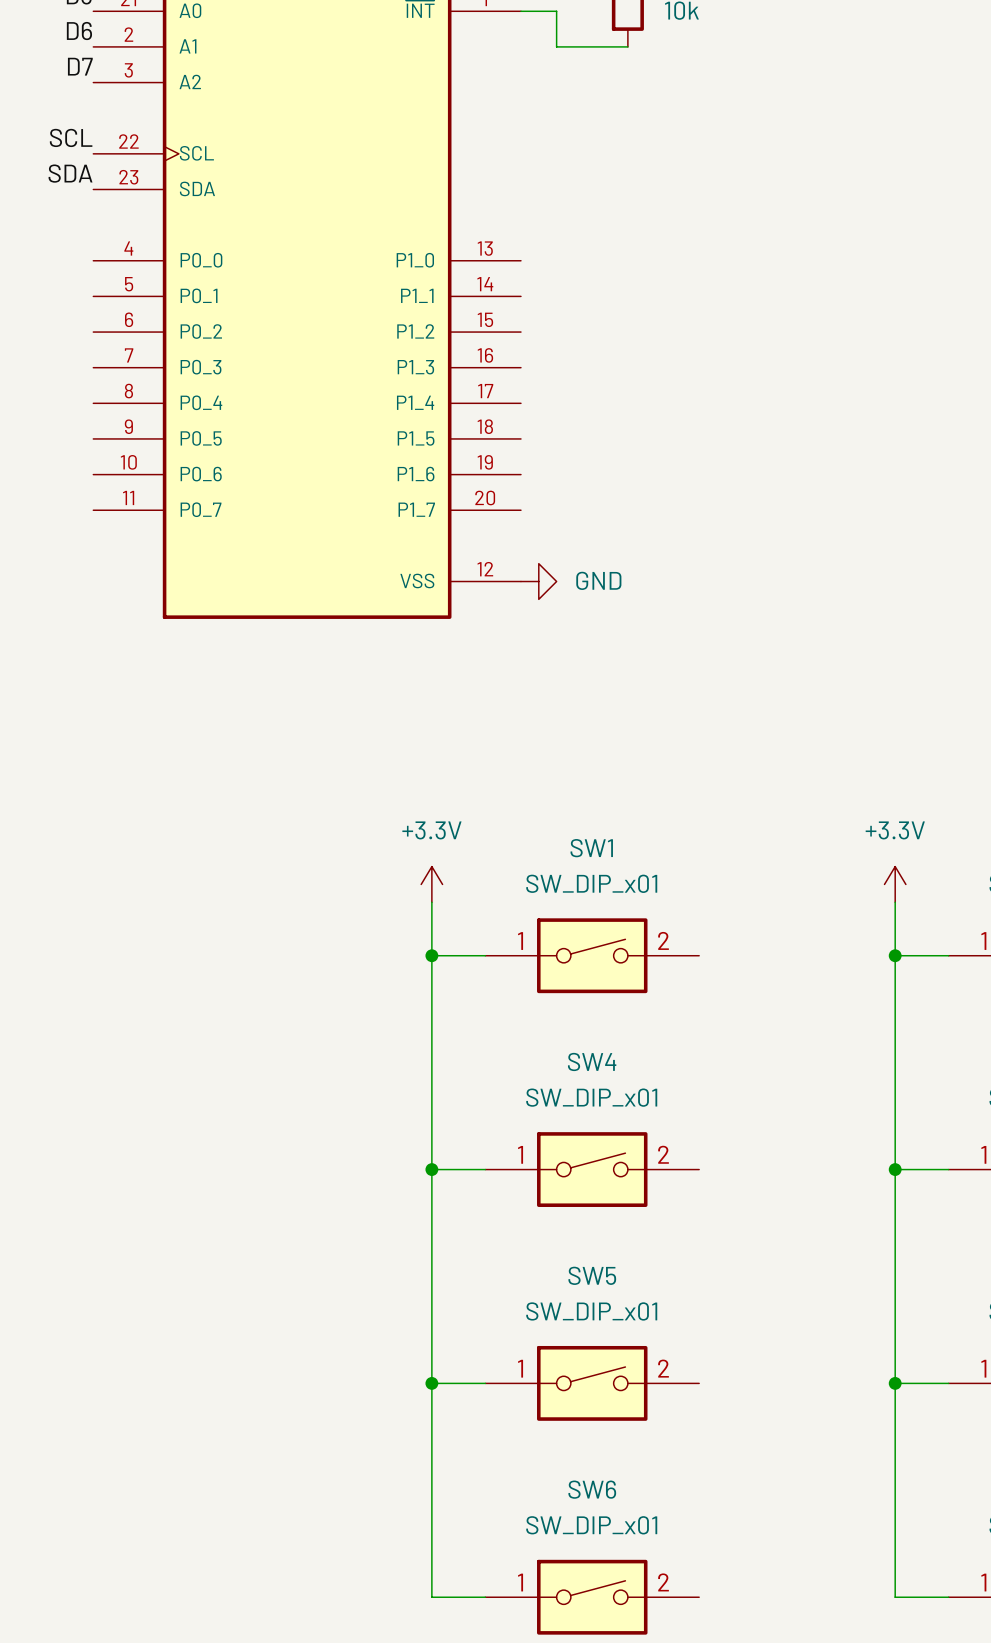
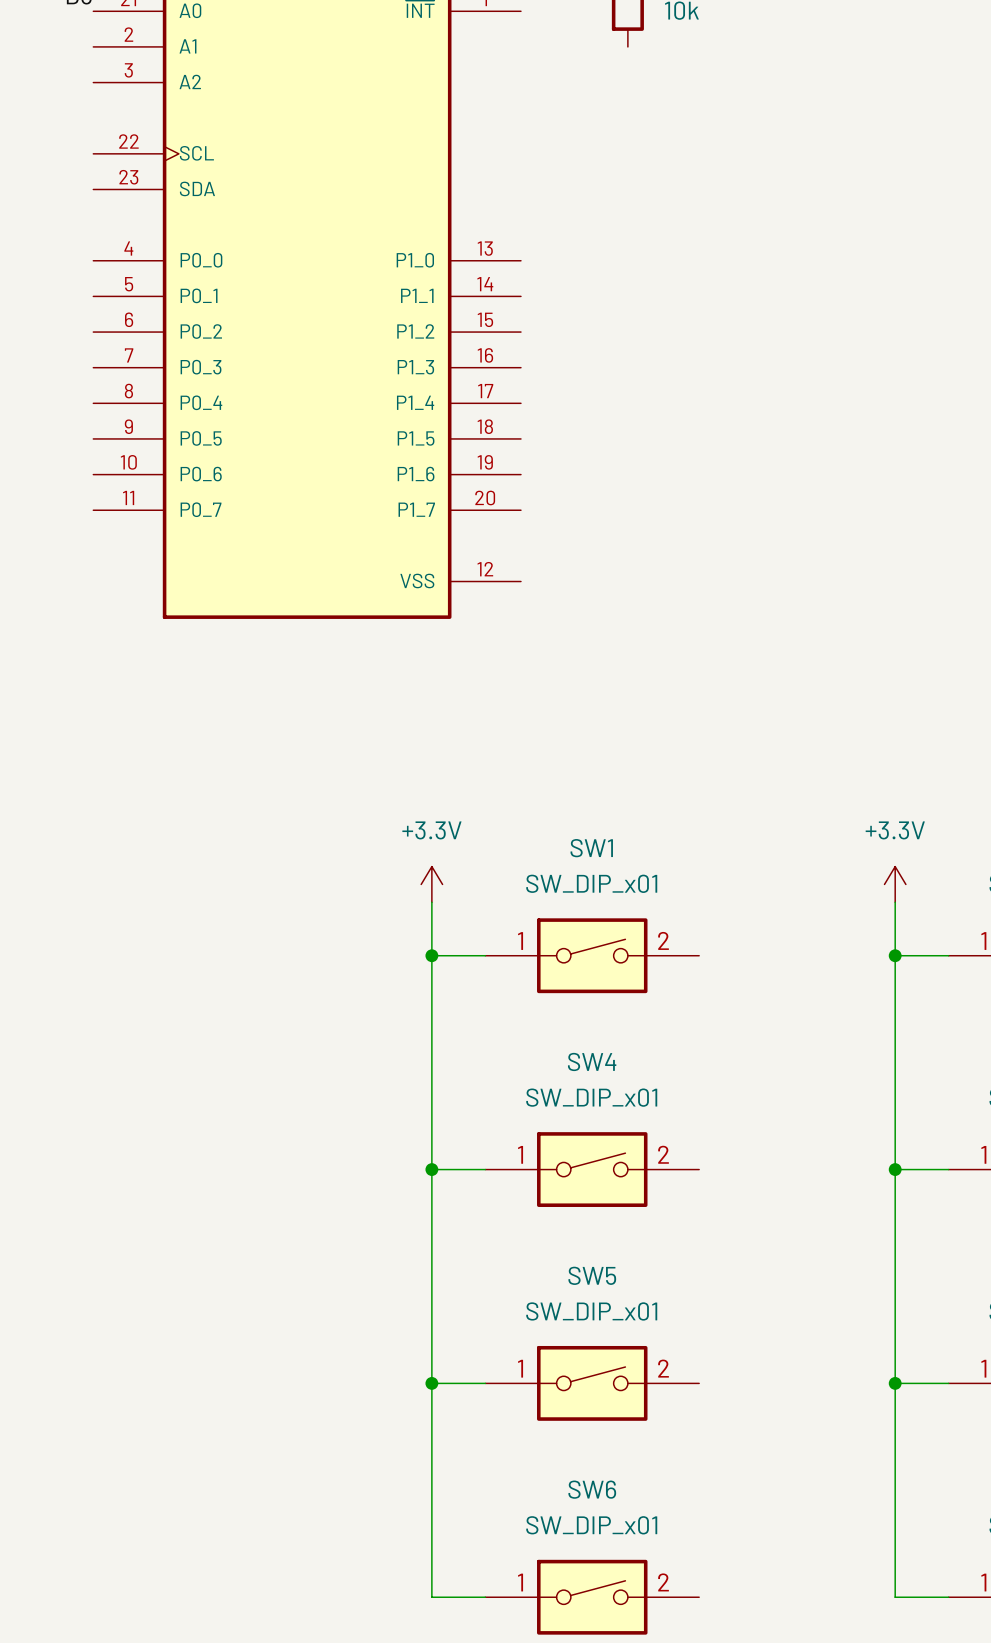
wire: (520, 11) (556, 11) (556, 46) (627, 46) -> none
label: D6 (79, 31) -> none
label: D7 (80, 66) -> none
label: SCL (71, 137) -> none
label: SDA (70, 173) -> none
power symbol: GND (538, 581) -> none

